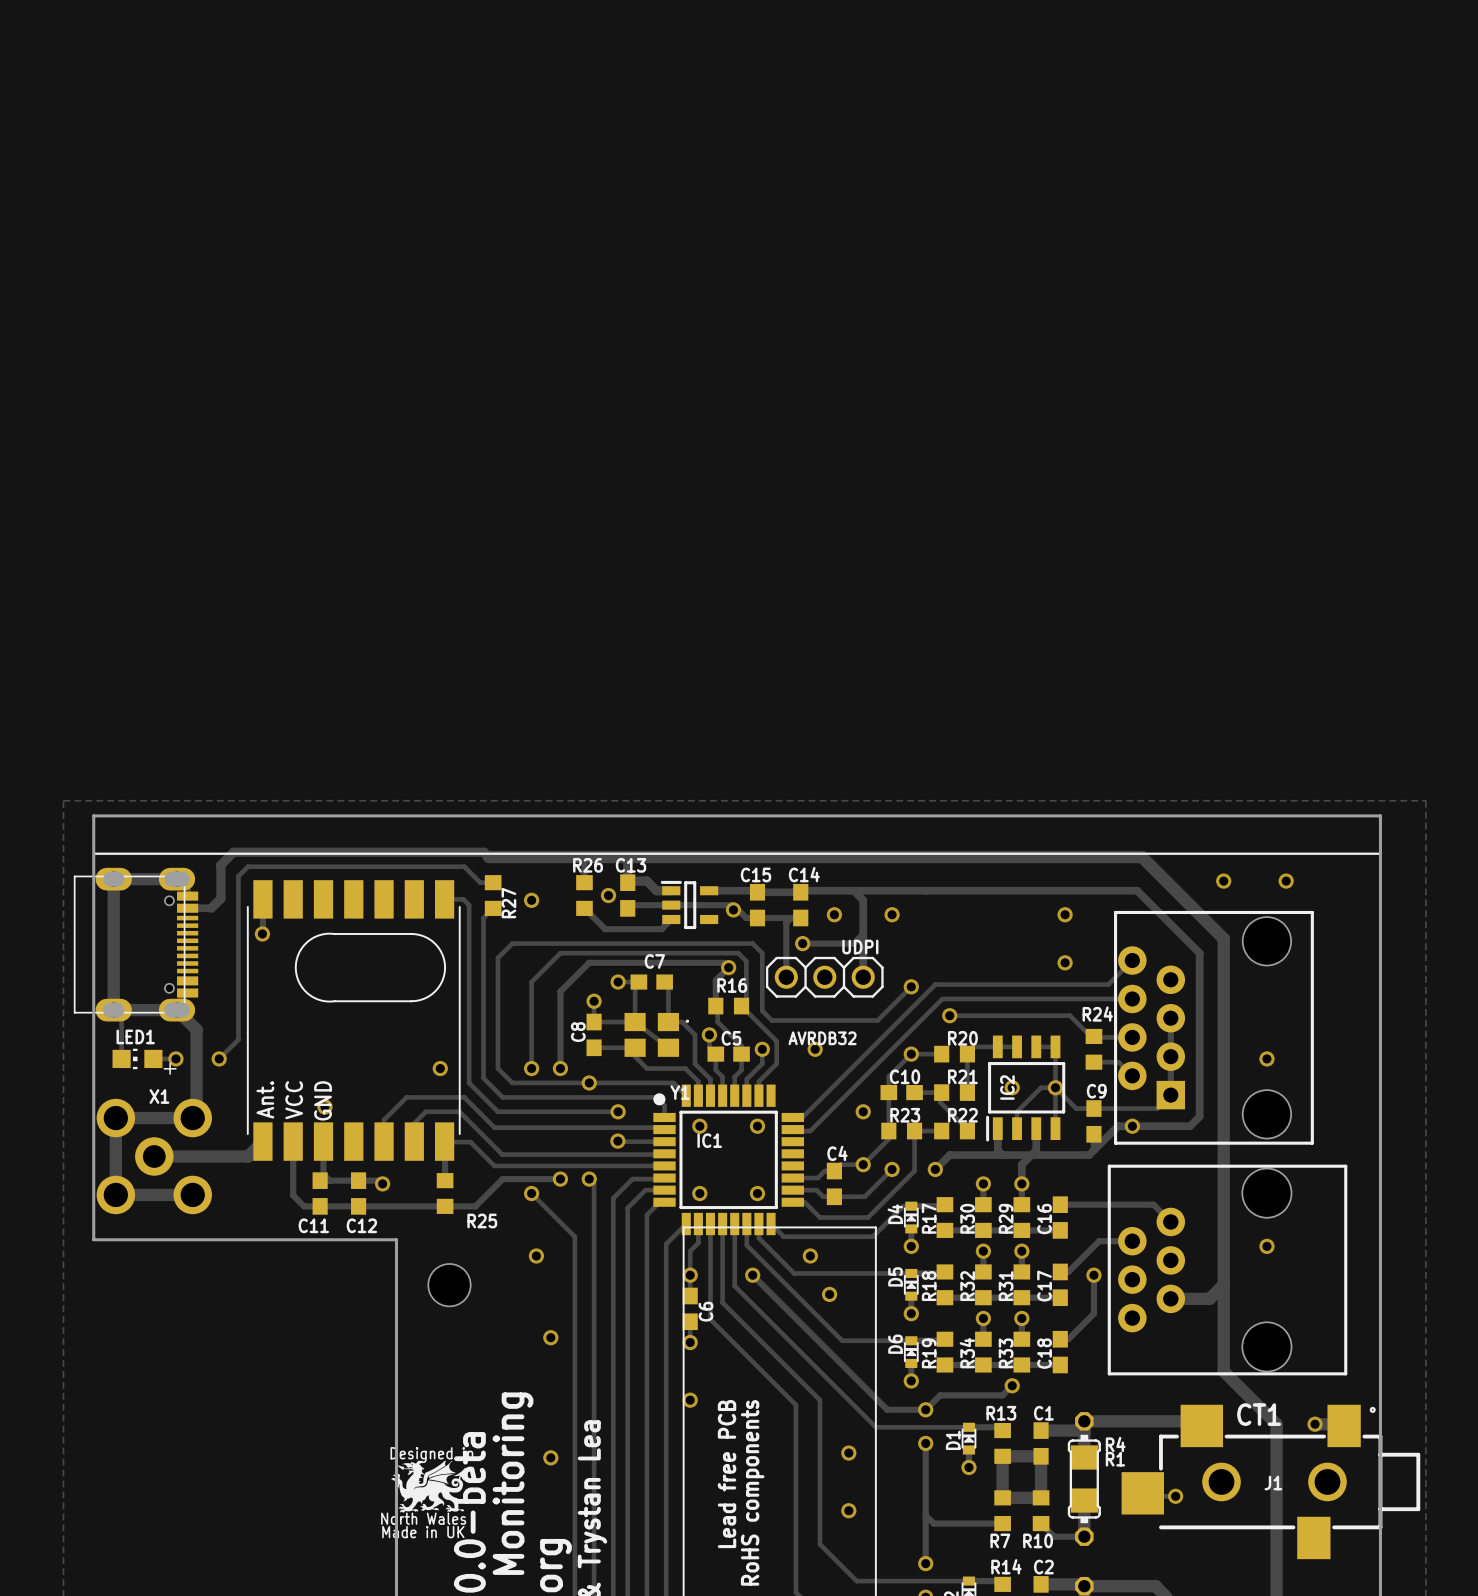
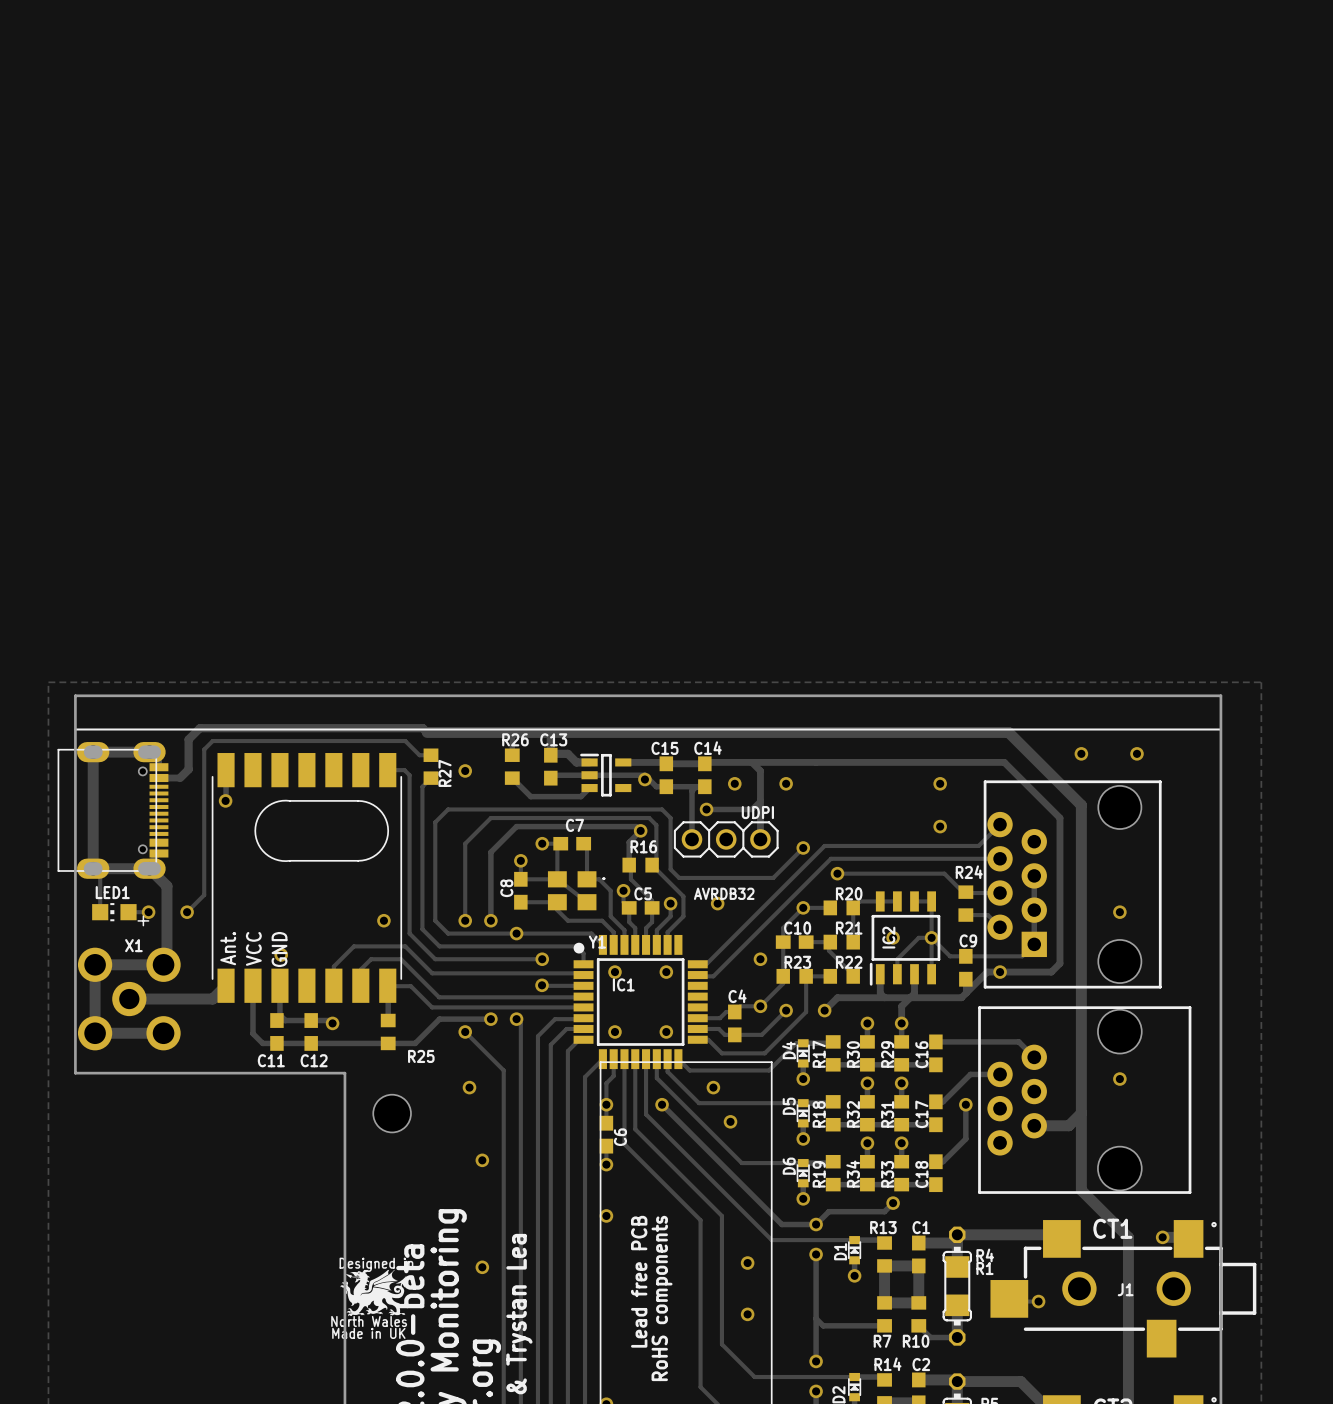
via: (608, 895) -> none

